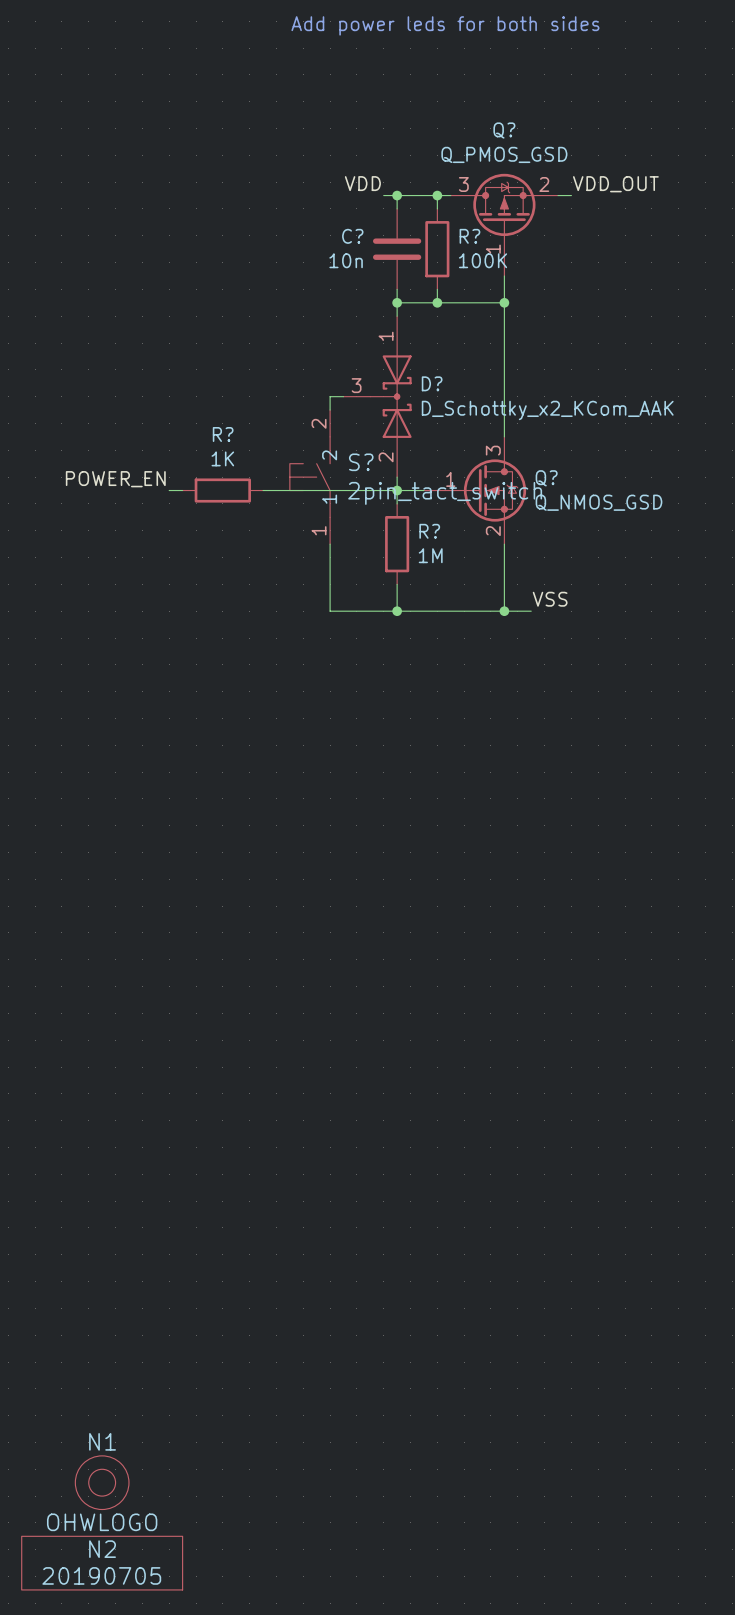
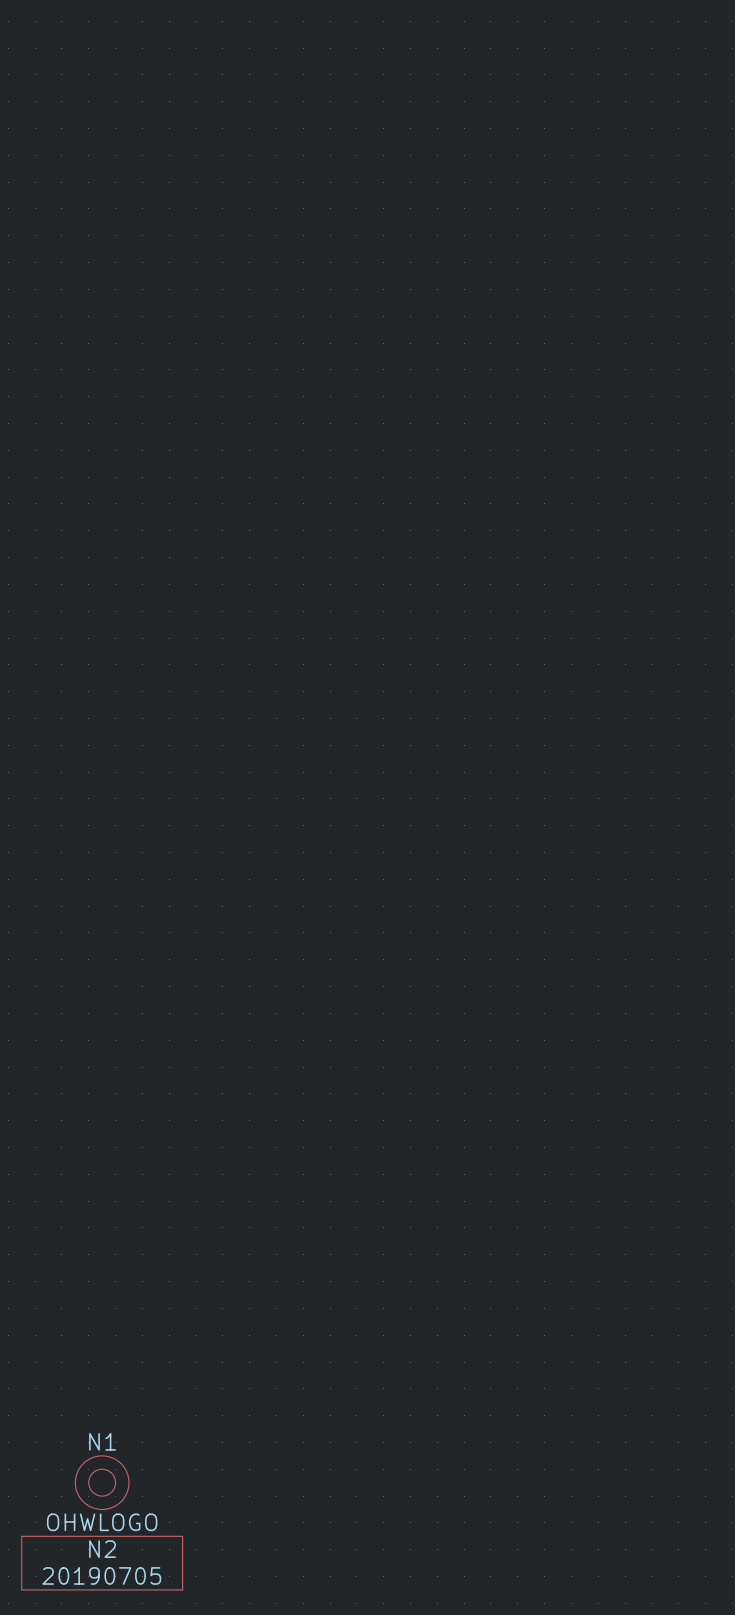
text: Add power leds for both sides (445, 25) -> none
label: VDD (362, 183) -> none
label: VDD_OUT (615, 184) -> none
wire: (383, 195) (450, 195) -> none
wire: (397, 195) (397, 208) -> none
junction: (397, 195) -> none
wire: (437, 195) (437, 208) -> none
junction: (437, 195) -> none
wire: (558, 195) (571, 195) -> none
Q?: Q_PMOS_GSD (504, 224) -> none
C?: 10n (397, 249) -> none
R?: 100K (437, 249) -> none
wire: (504, 276) (504, 436) -> none
wire: (397, 289) (397, 316) -> none
wire: (437, 289) (437, 302) -> none
wire: (397, 302) (504, 302) -> none
junction: (397, 302) -> none
junction: (437, 302) -> none
junction: (504, 302) -> none
wire: (343, 396) (330, 396) (330, 410) -> none
D?: D_Schottky_x2_KCom_AAK (377, 396) -> none
S?: 2pin_tact_switch (309, 477) -> none
wire: (397, 477) (397, 503) -> none
label: POWER_EN (115, 479) -> none
wire: (169, 490) (182, 490) -> none
R?: 1K (222, 490) -> none
wire: (263, 490) (423, 490) -> none
junction: (397, 490) -> none
Q?: Q_NMOS_GSD (475, 490) -> none
wire: (330, 544) (330, 611) (531, 611) -> none
R?: 1M (397, 544) -> none
wire: (504, 544) (504, 611) -> none
wire: (397, 584) (397, 611) -> none
label: VSS (550, 599) -> none
junction: (397, 611) -> none
junction: (504, 611) -> none

